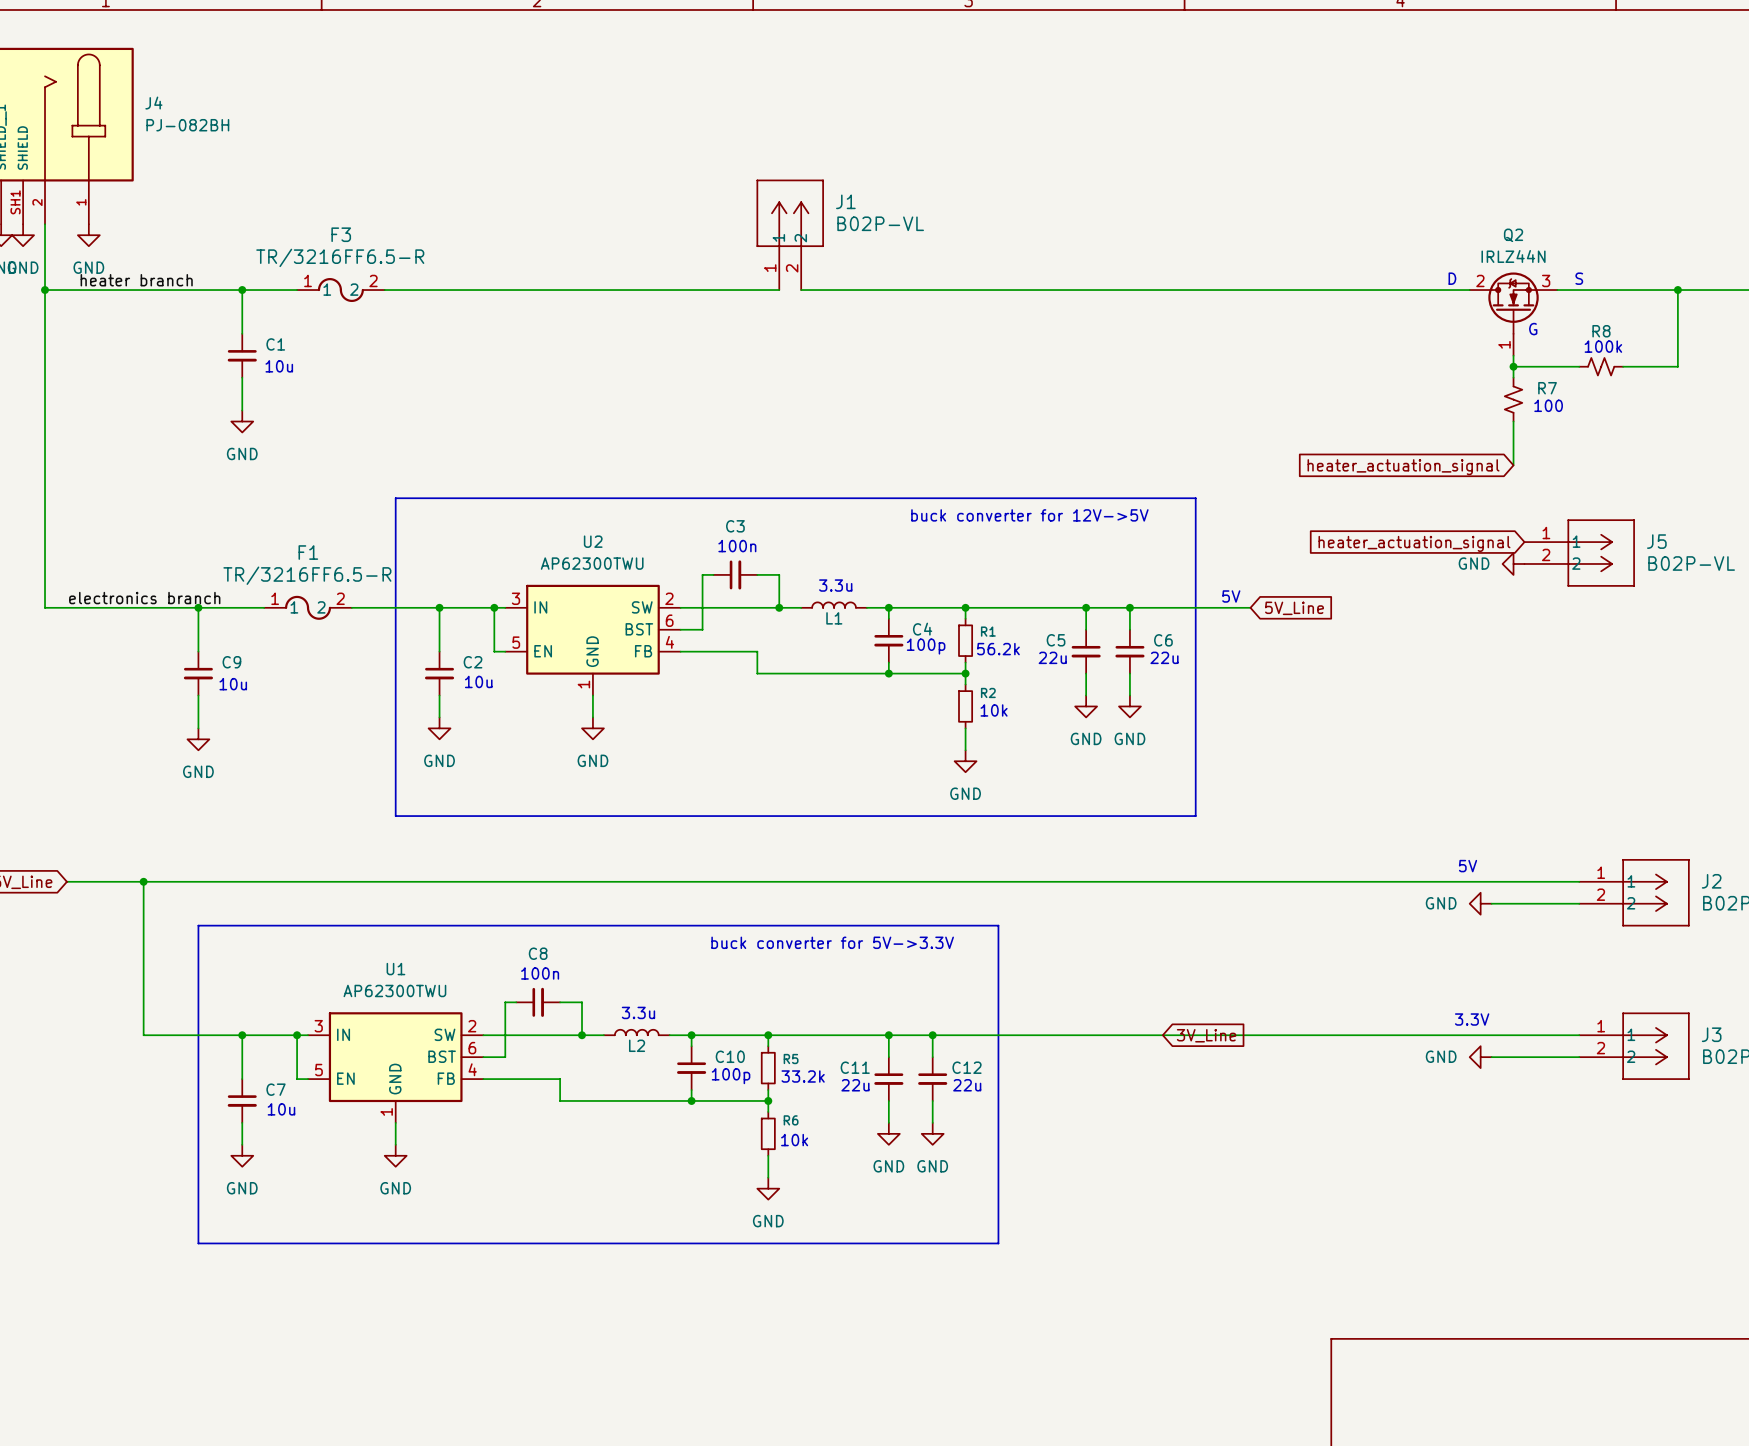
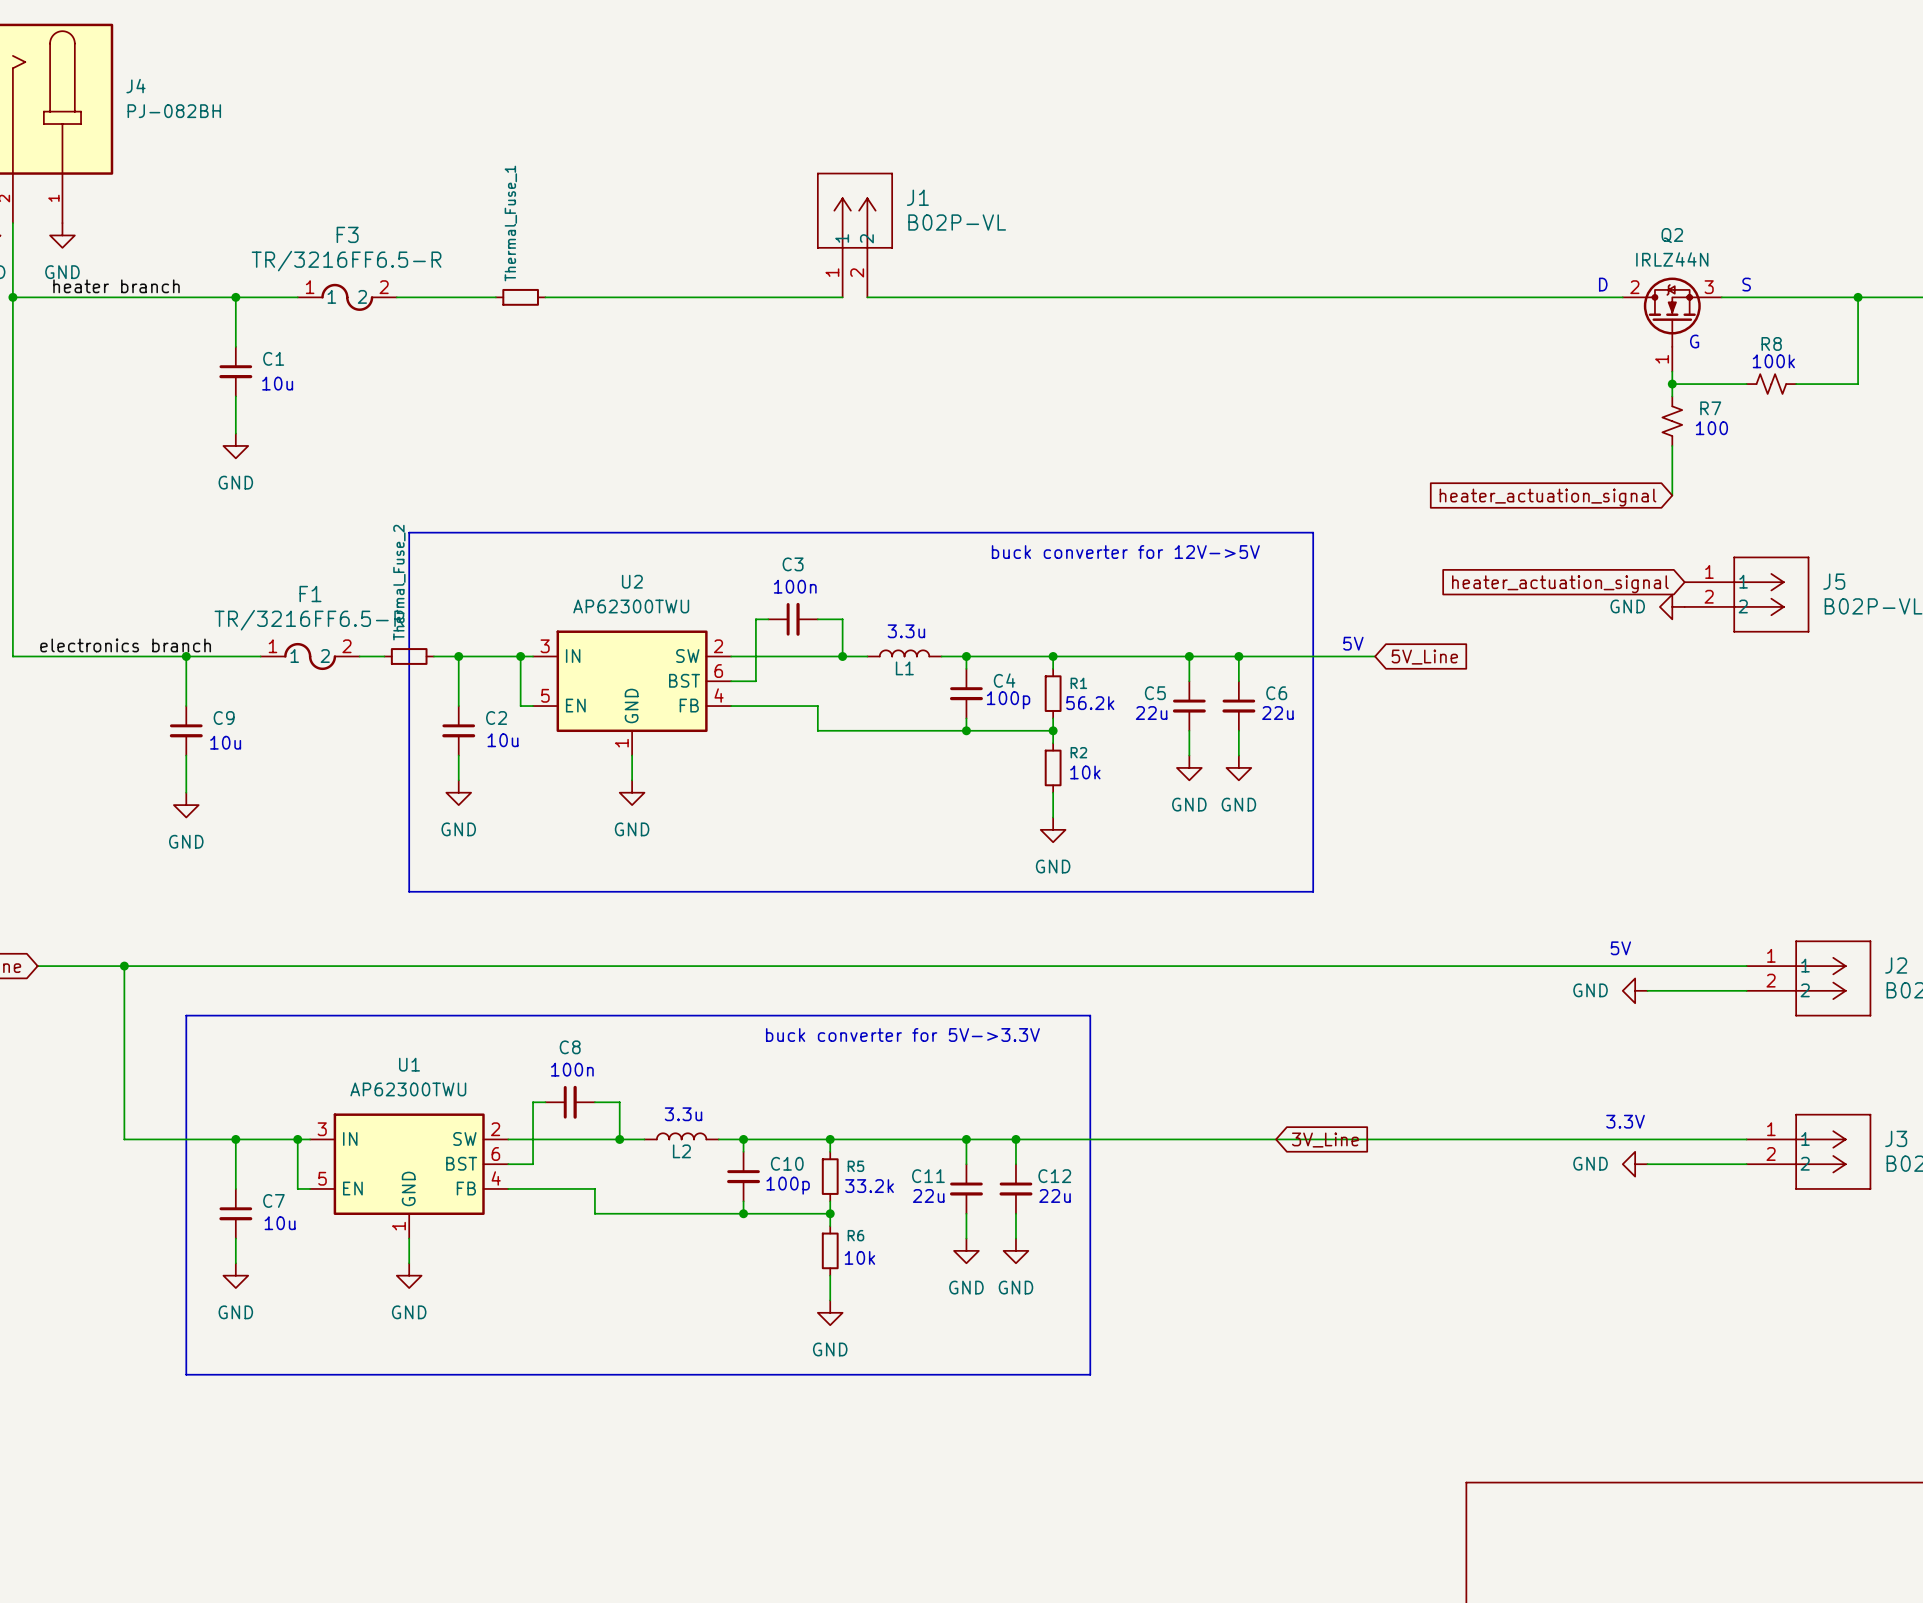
wire: (472, 290) (516, 290) -> none
Thermal_Fuse_1: none -> (520, 297)
wire: (373, 607) (417, 607) -> none
Thermal_Fuse_2: none -> (409, 656)

